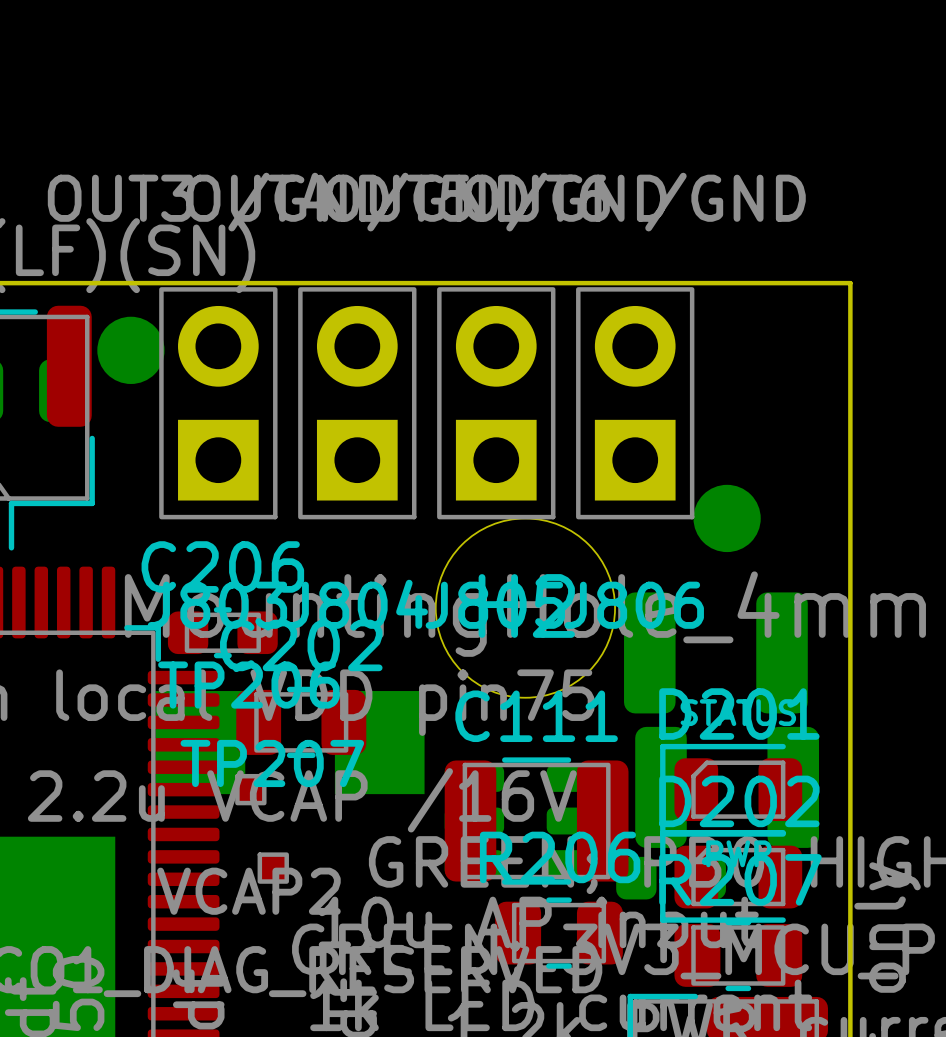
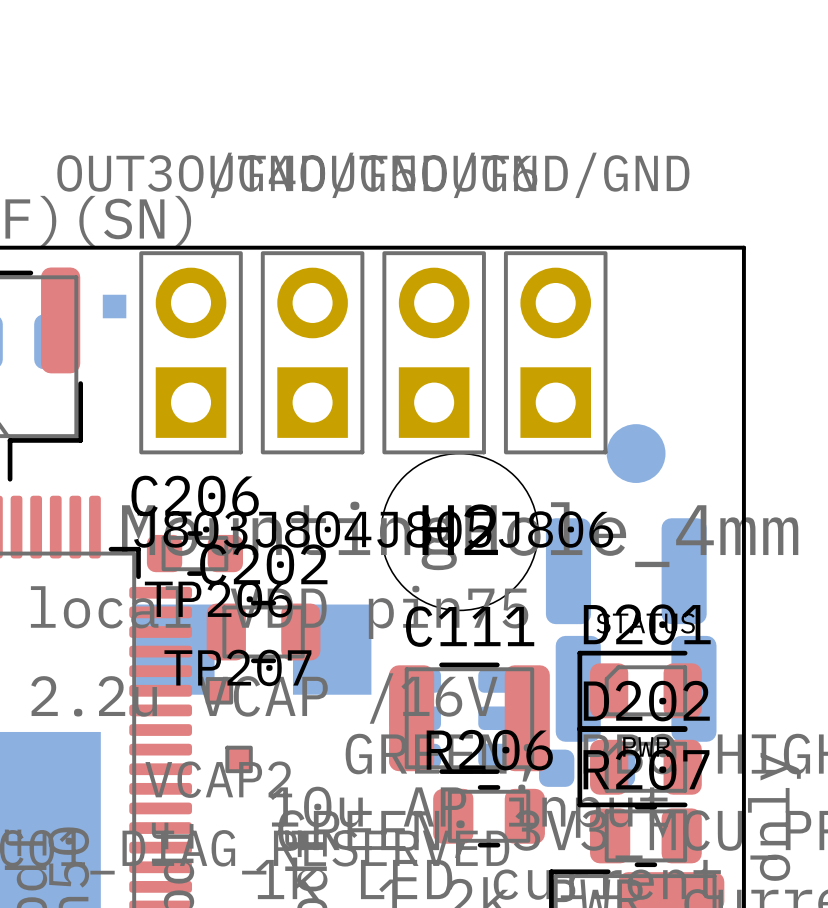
part footprint: [97, 316, 165, 384] -> [102, 294, 127, 319]

